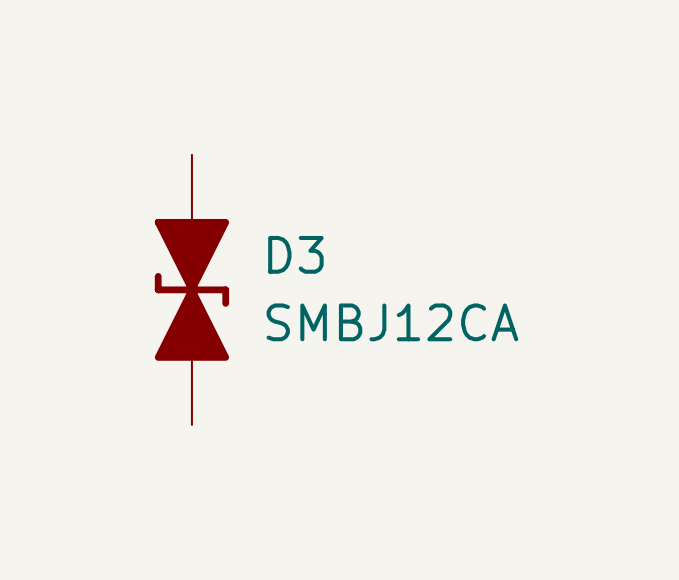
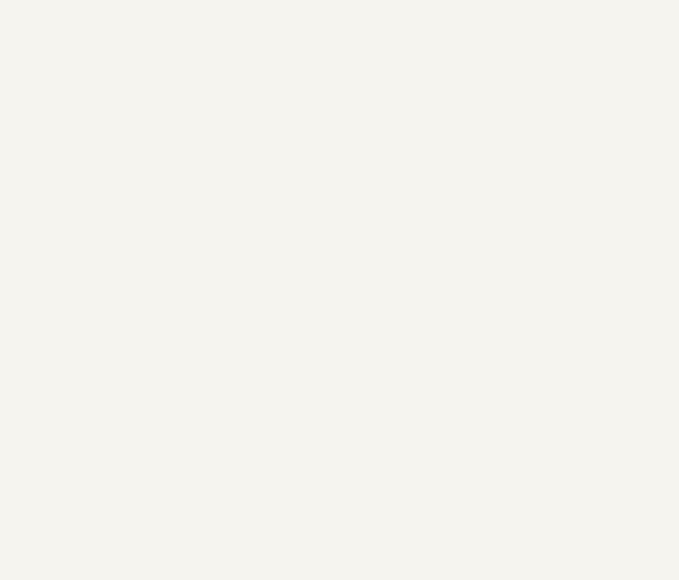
D3: SMBJ12CA (191, 289) -> none

